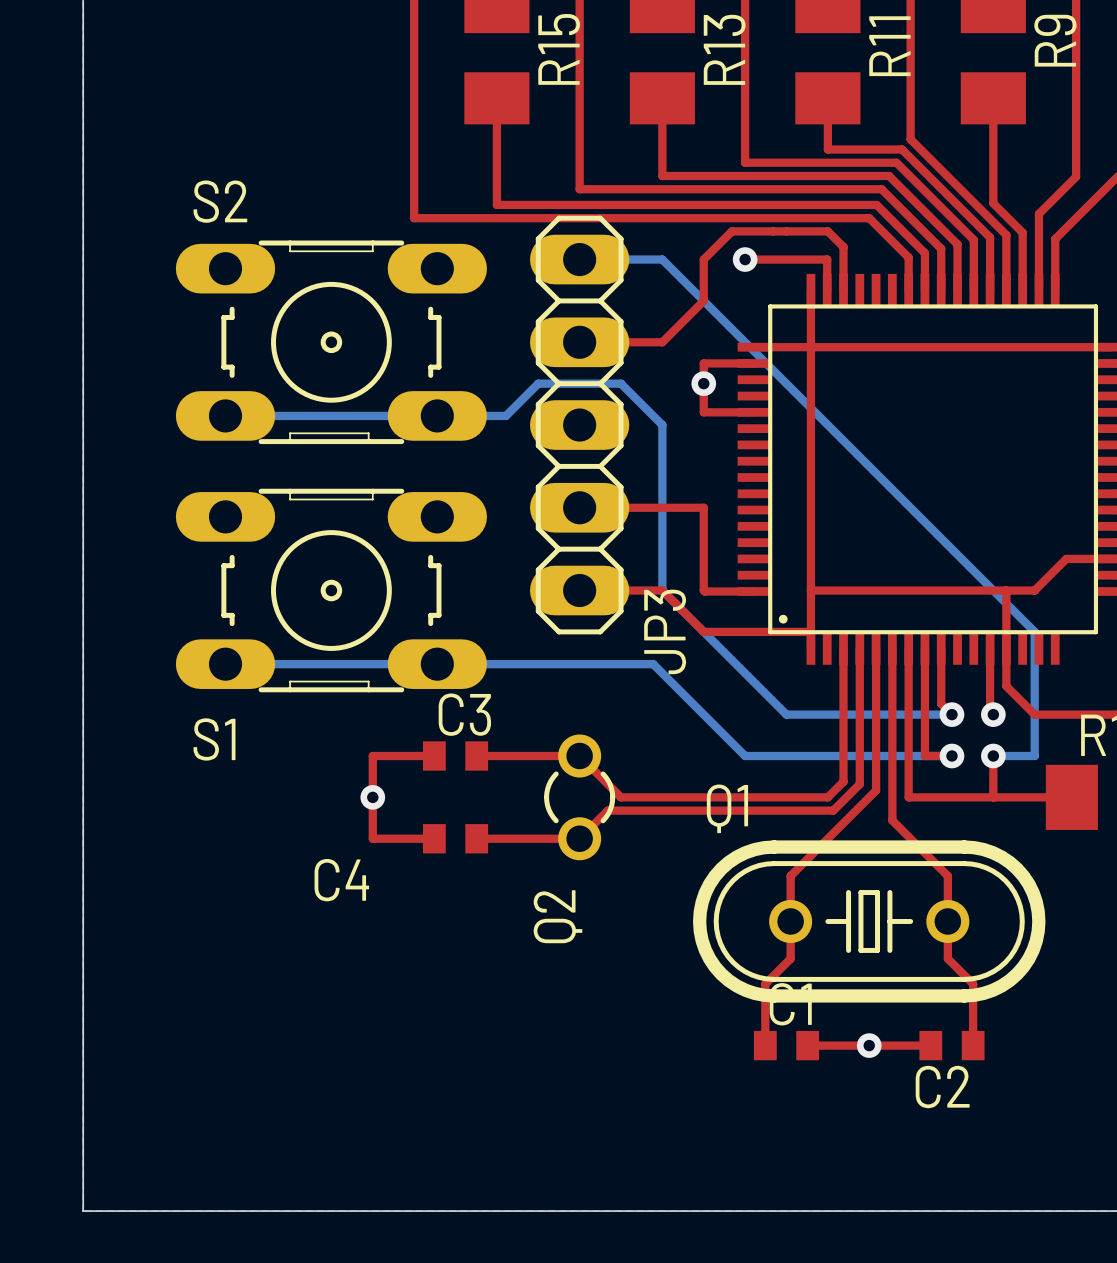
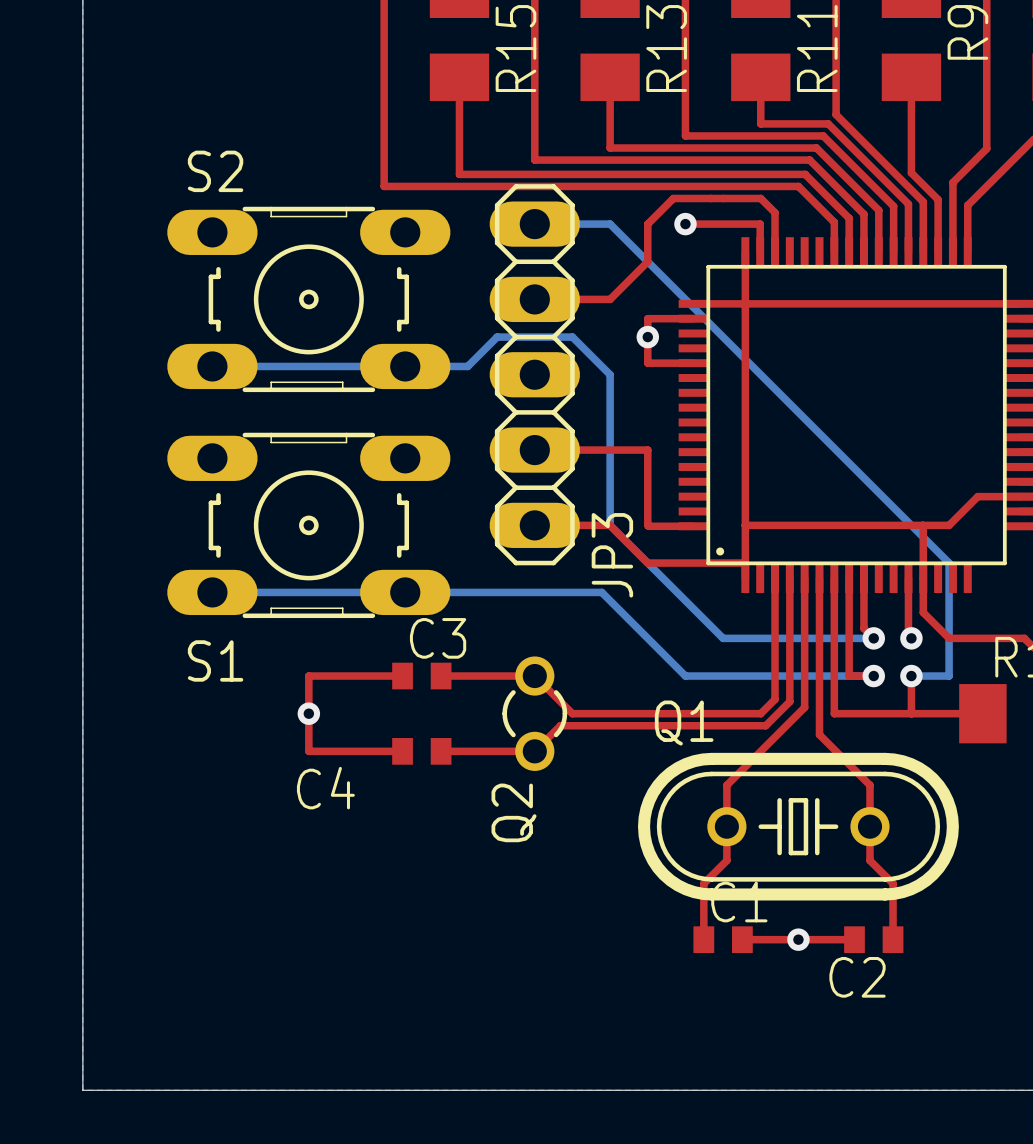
top track: (372, 756) (372, 838) -> (346, 676) (308, 676) (308, 751) (346, 751)
via position: (372, 797) -> (308, 713)

